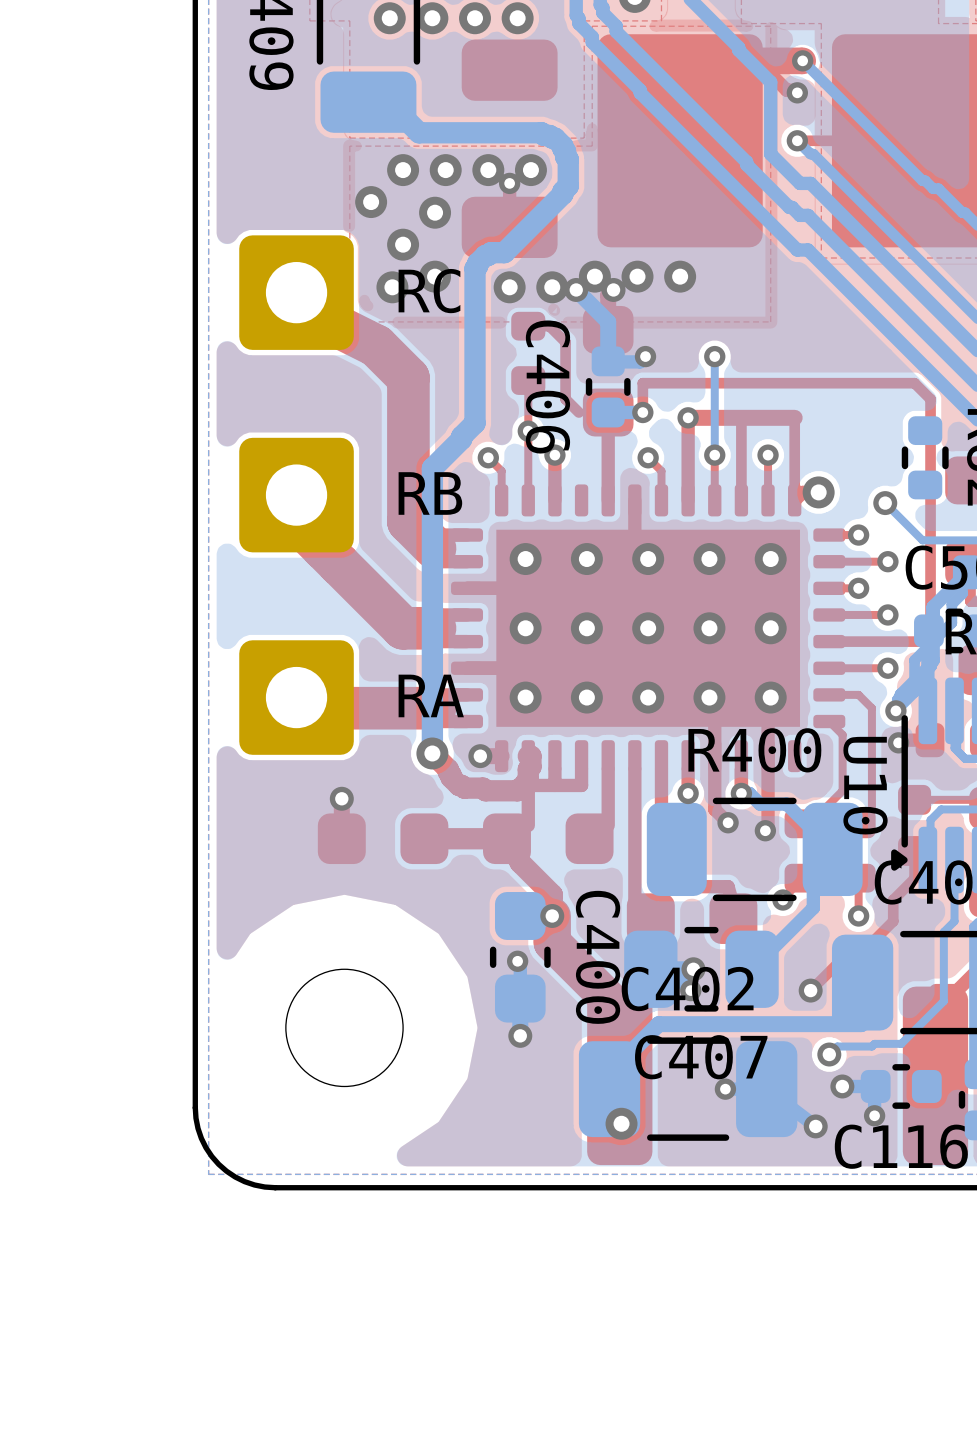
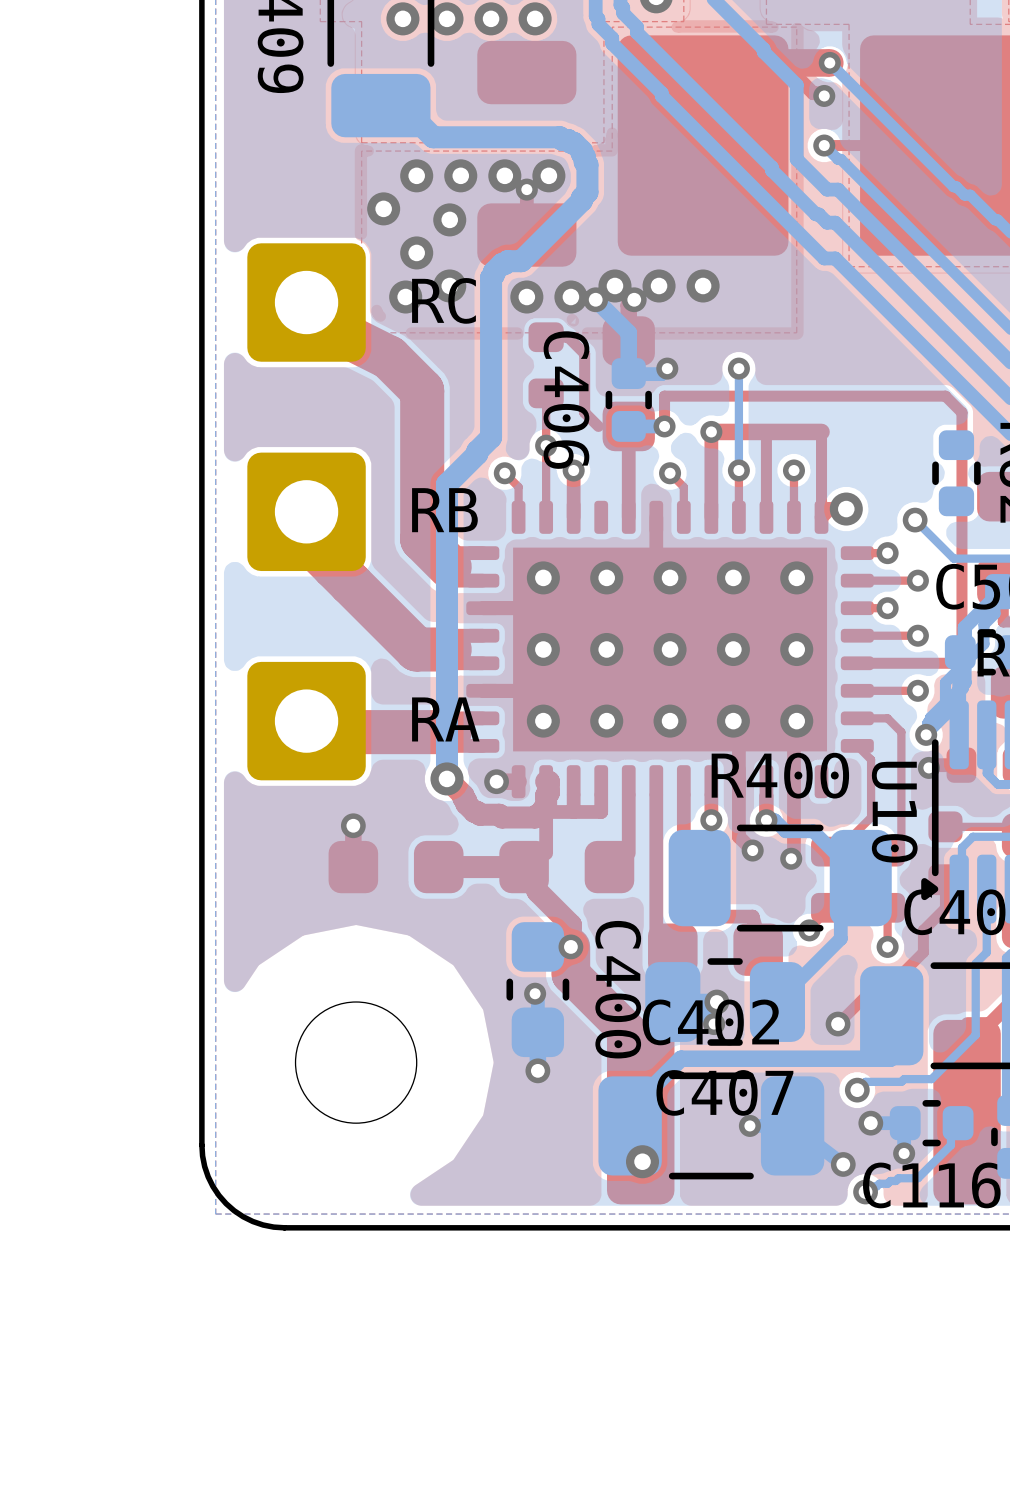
bottom track: none -> (958, 1123) (950, 1136) (950, 1145) (917, 1178) (898, 1178) (887, 1183) (871, 1186) (865, 1192)
via: none -> (865, 1192)

